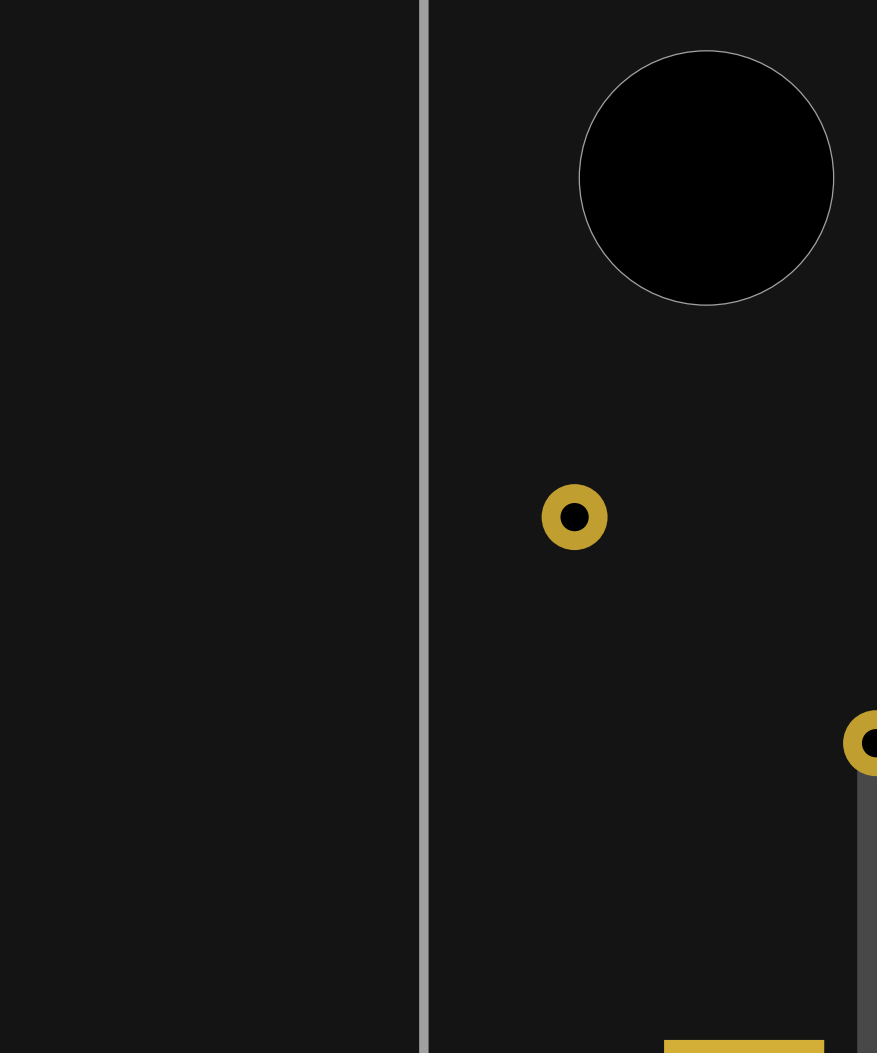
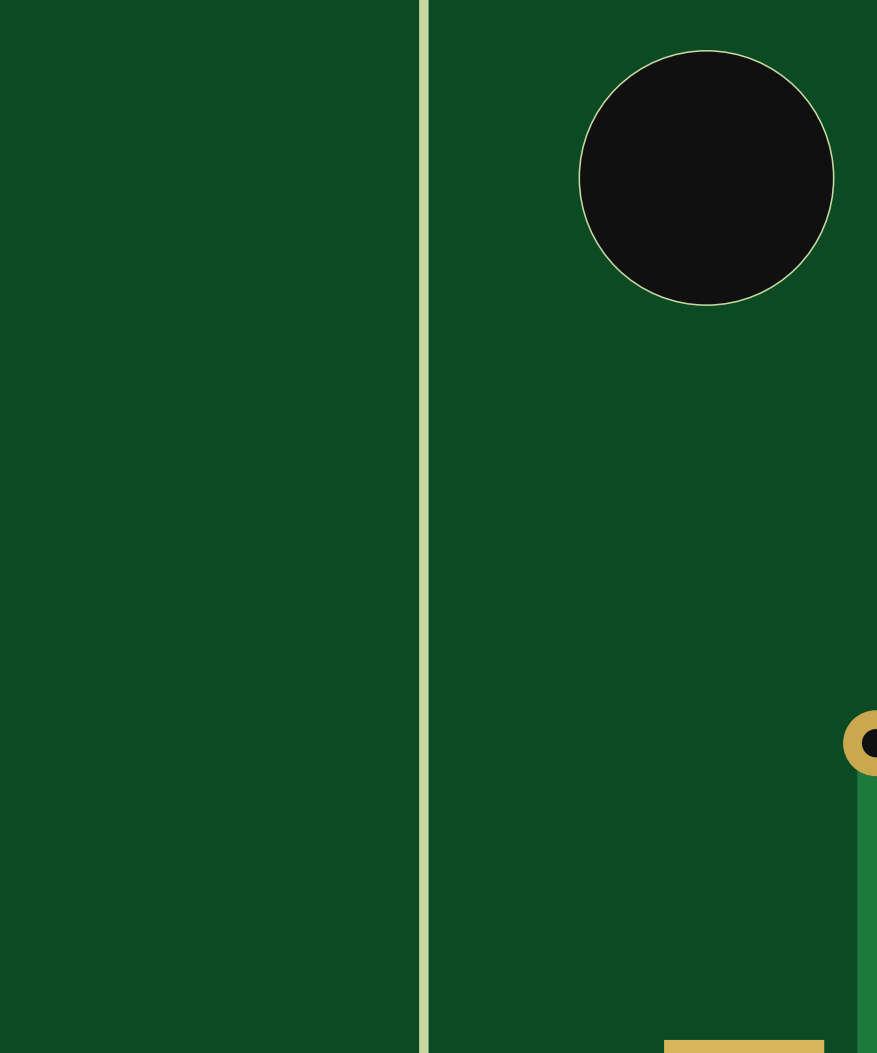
via: (574, 517) -> none

